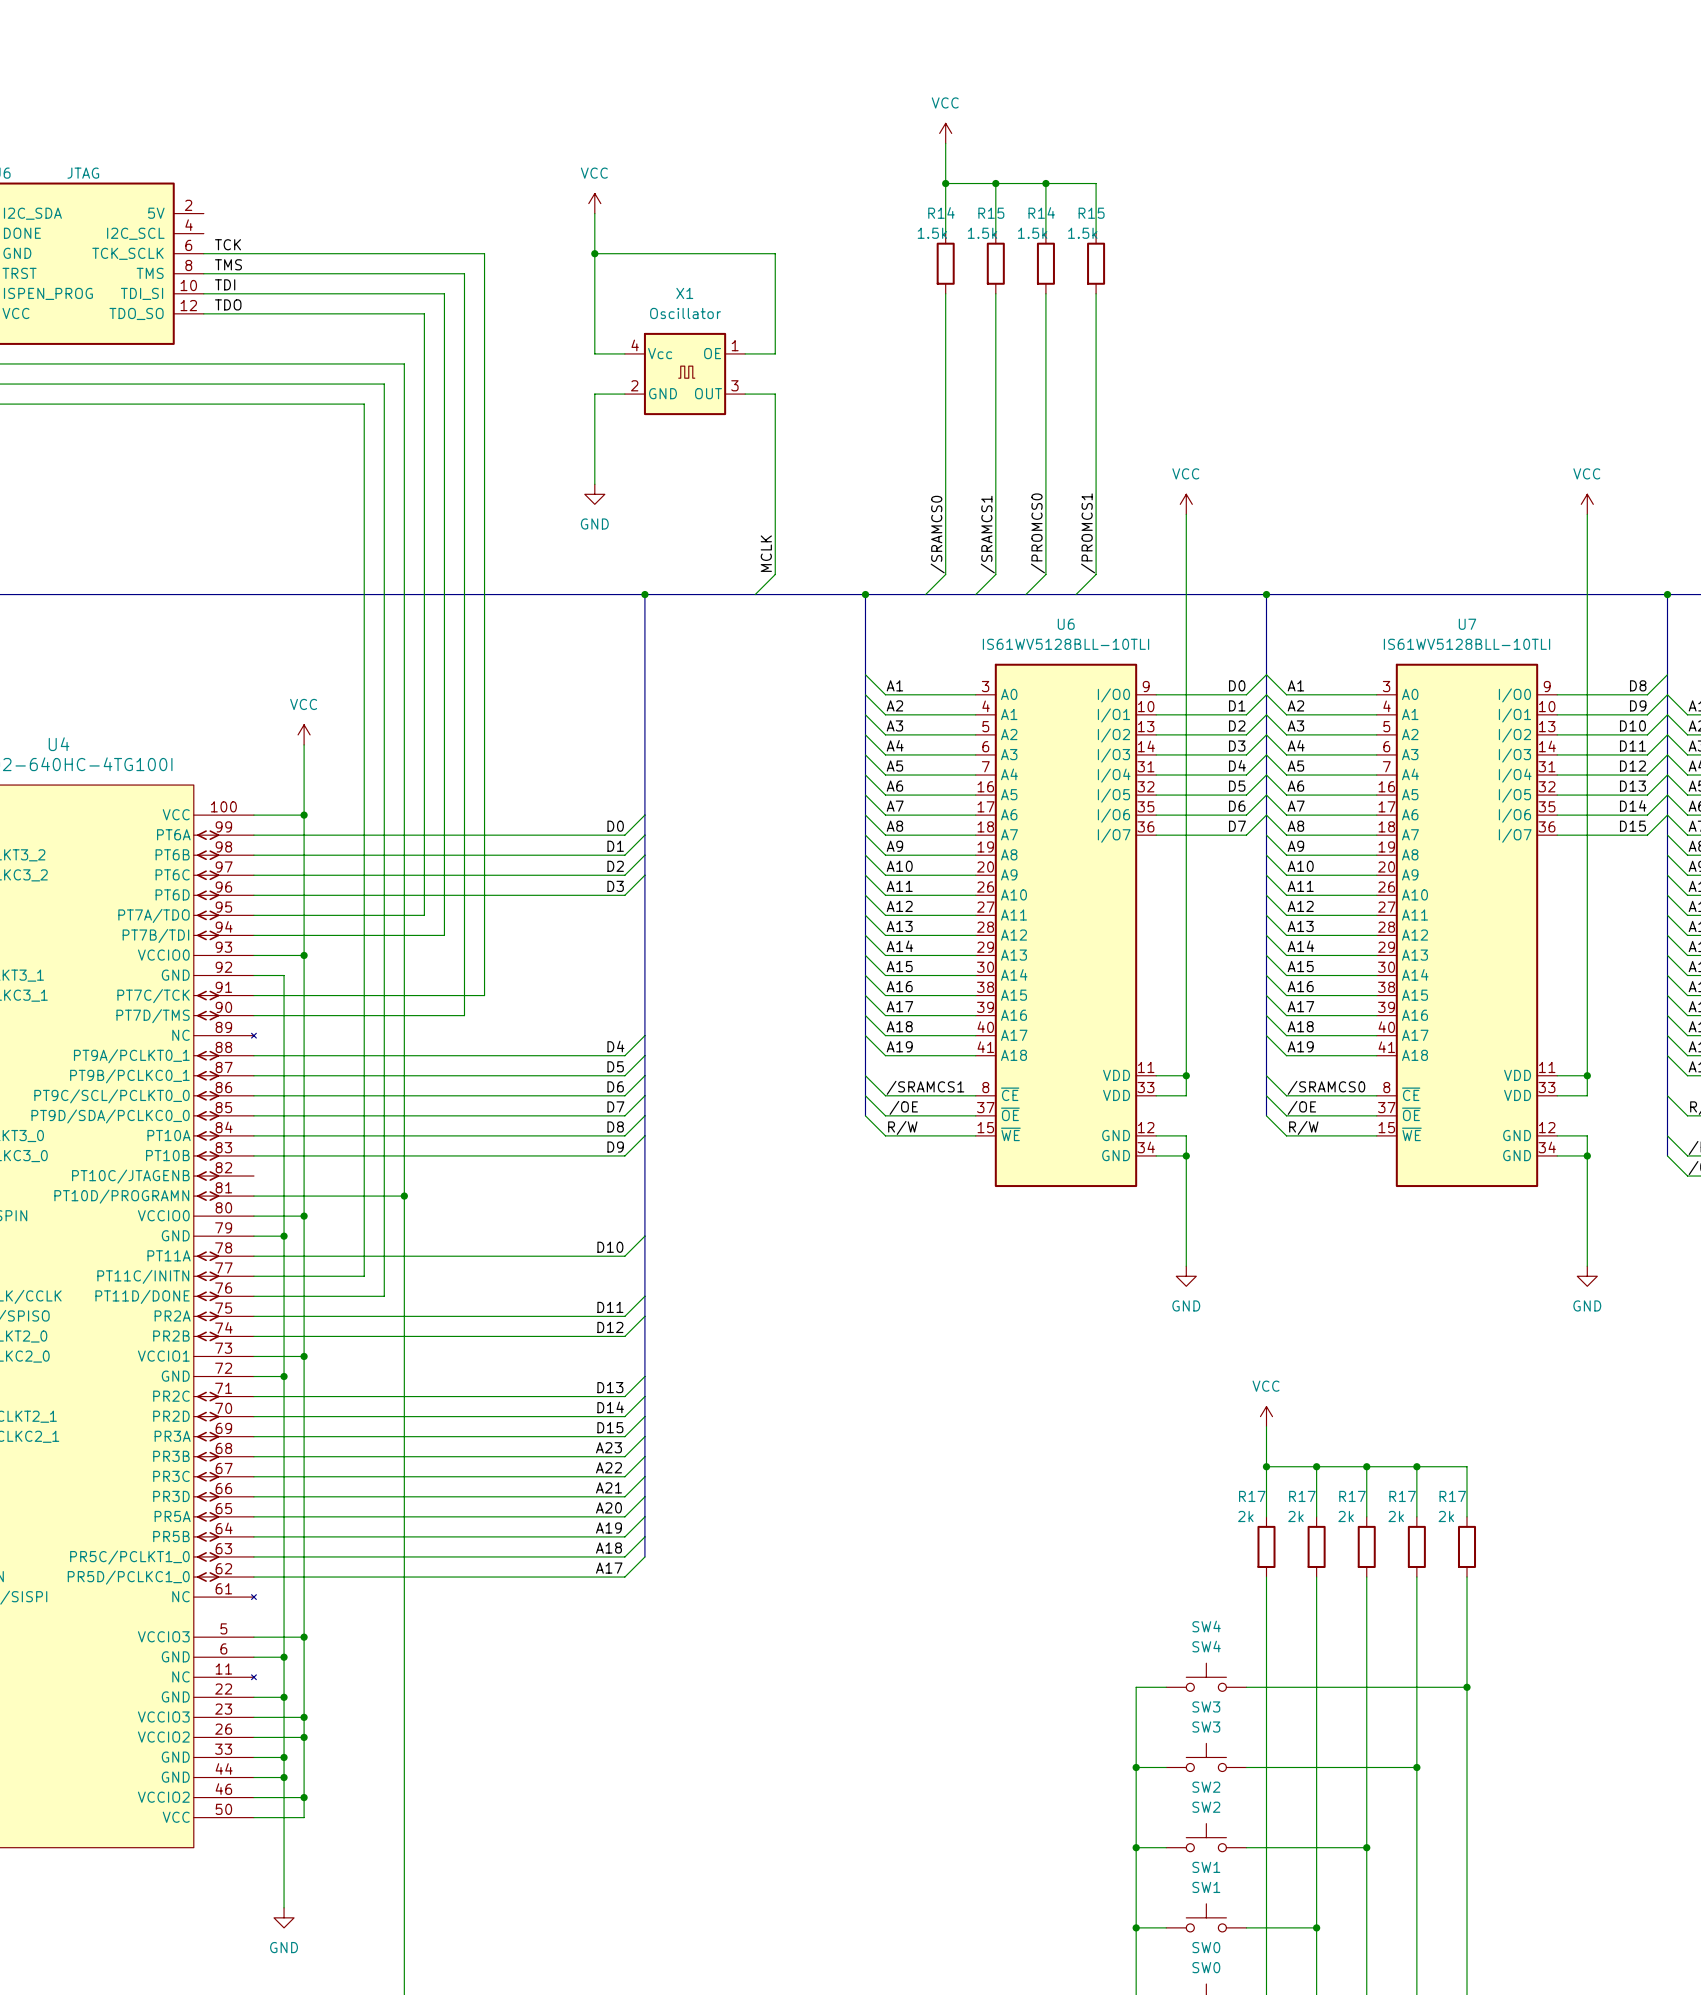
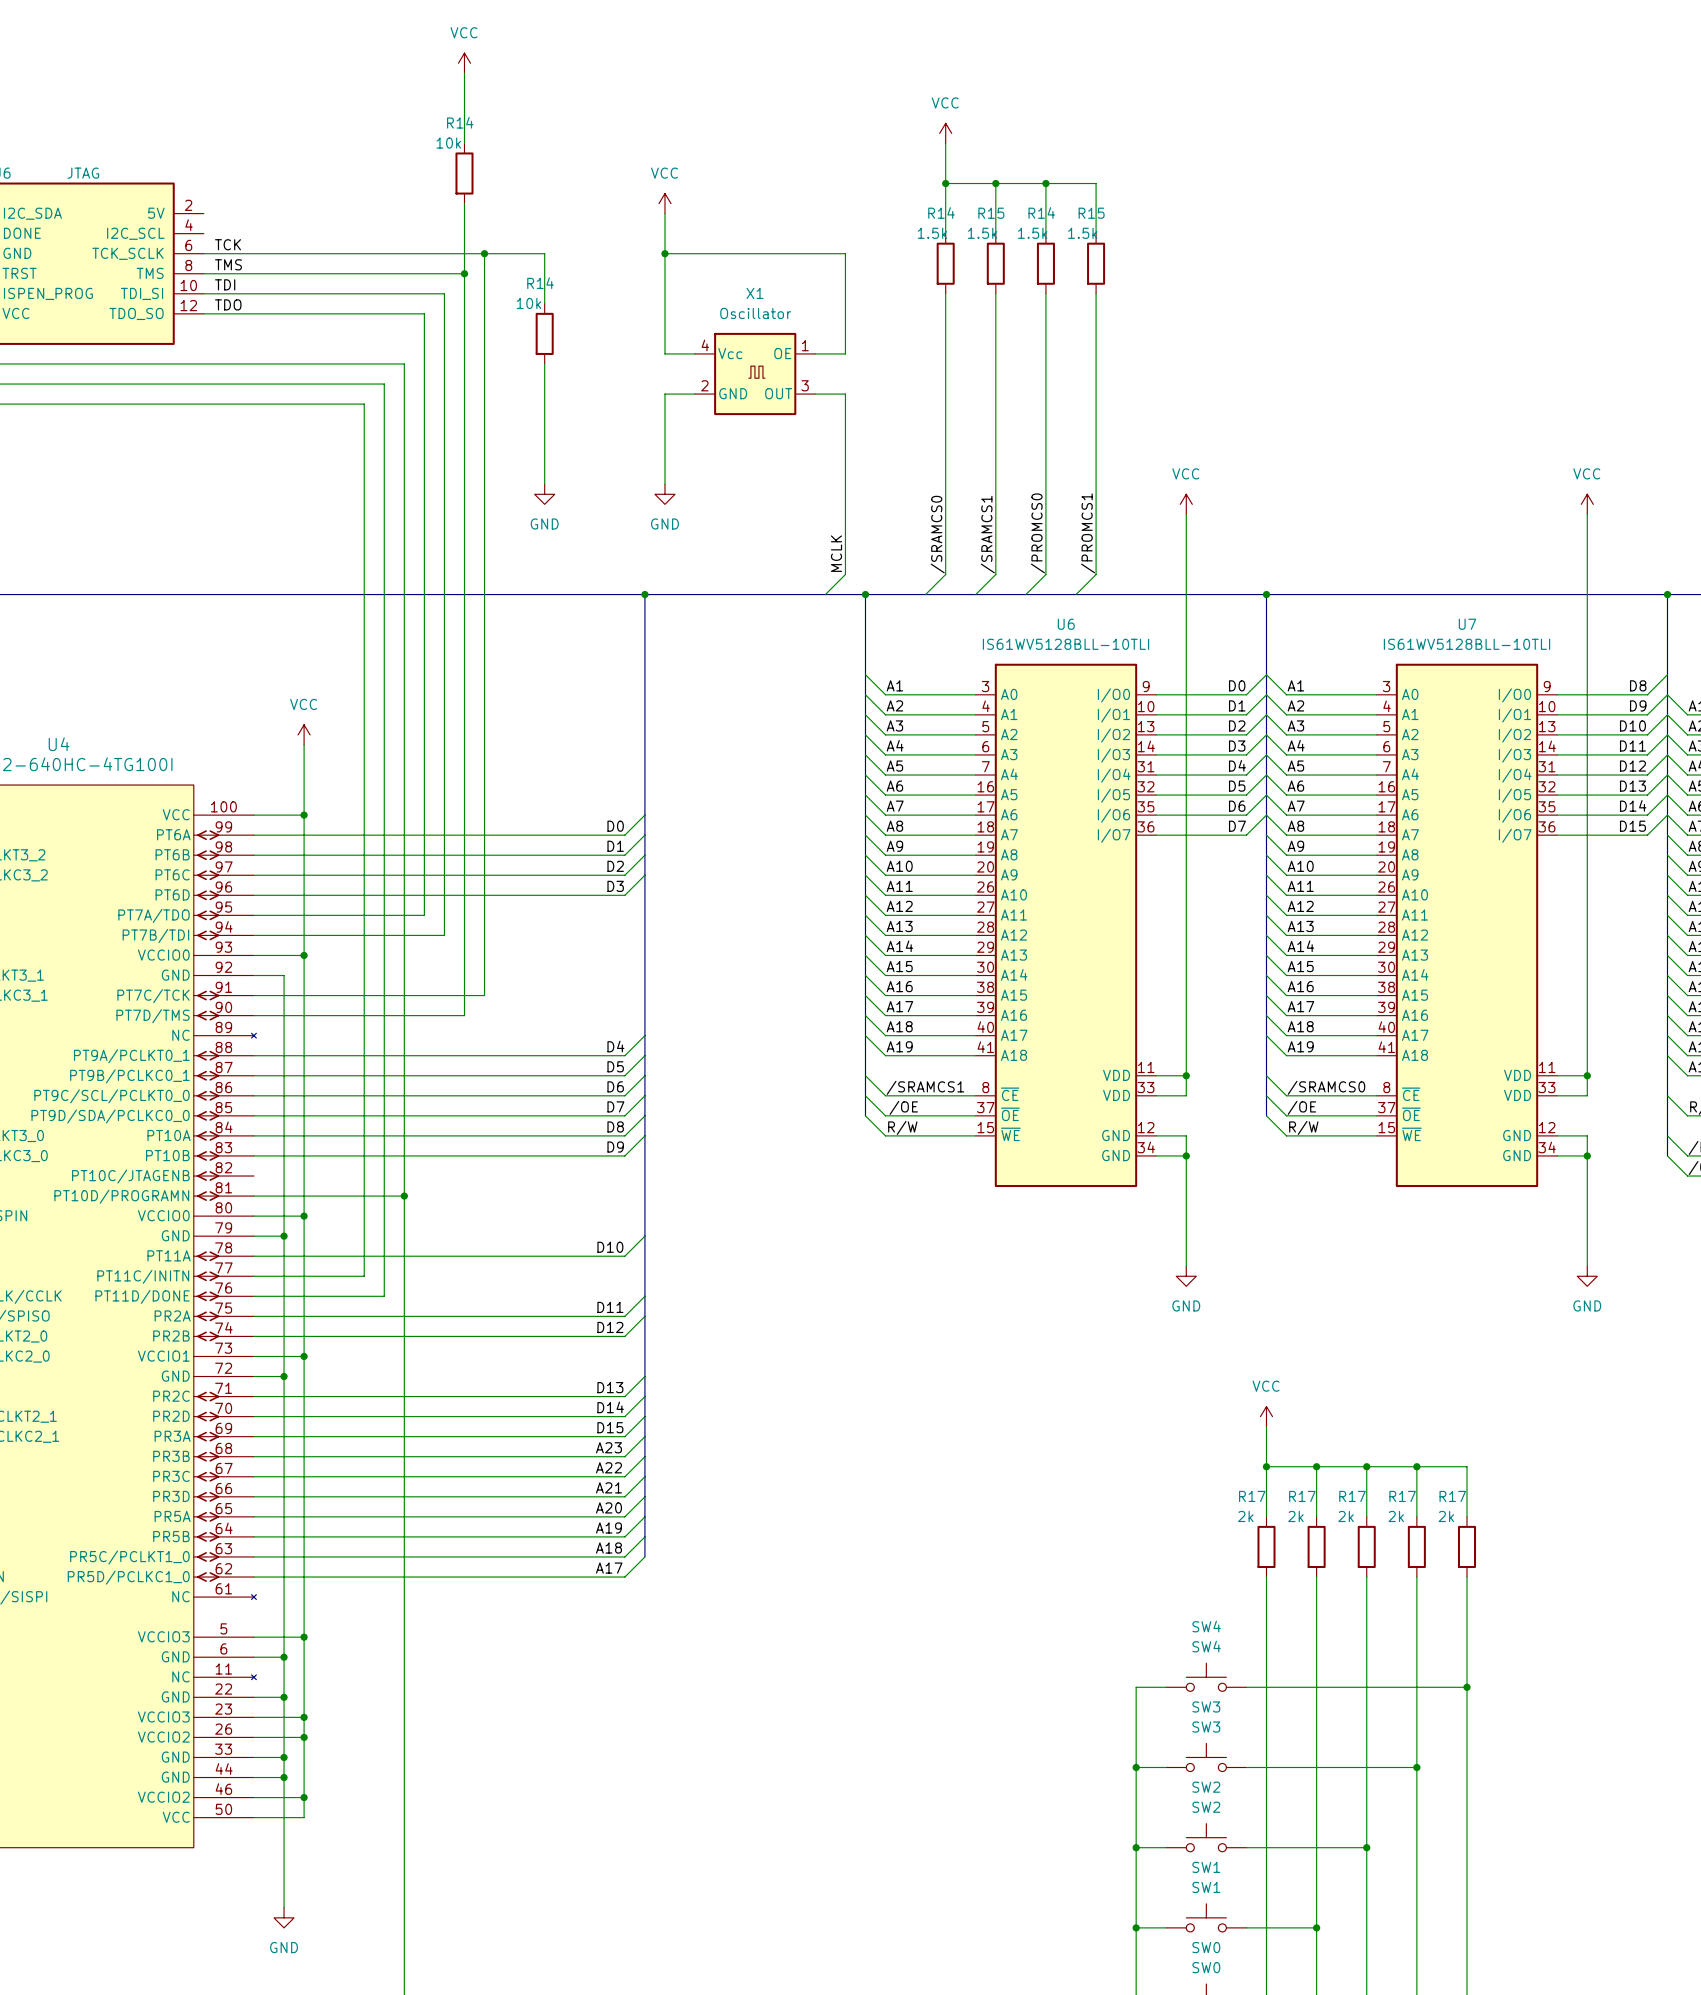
power symbol: none -> VCC (464, 63)
wire: none -> (464, 73) (464, 143)
R14: none -> 10k (464, 173)
wire: none -> (464, 203) (464, 273)
power symbol position: VCC (594, 203) -> VCC (664, 203)
wire: (594, 213) (594, 353) (624, 353) -> (664, 213) (664, 353) (695, 353)
wire: none -> (484, 253) (544, 253) (544, 303)
junction: none -> (484, 253)
wire: (594, 253) (664, 253) -> none
junction: (594, 253) -> none
junction: none -> (664, 253)
wire: (775, 253) (775, 353) (745, 353) -> (775, 253) (845, 253) (845, 353) (815, 353)
junction: none -> (464, 273)
R14: none -> 10k (544, 333)
wire: none -> (544, 363) (544, 484)
X1 position: (685, 374) -> (755, 374)
wire: (624, 394) (594, 394) (594, 484) -> (695, 394) (664, 394) (664, 484)
wire: (745, 394) (775, 394) (775, 574) (755, 594) -> (815, 394) (845, 394) (845, 574) (825, 594)
power symbol: none -> GND (544, 494)
power symbol: GND (594, 494) -> none
power symbol: none -> GND (664, 494)
label position: MCLK (766, 553) -> MCLK (836, 553)

